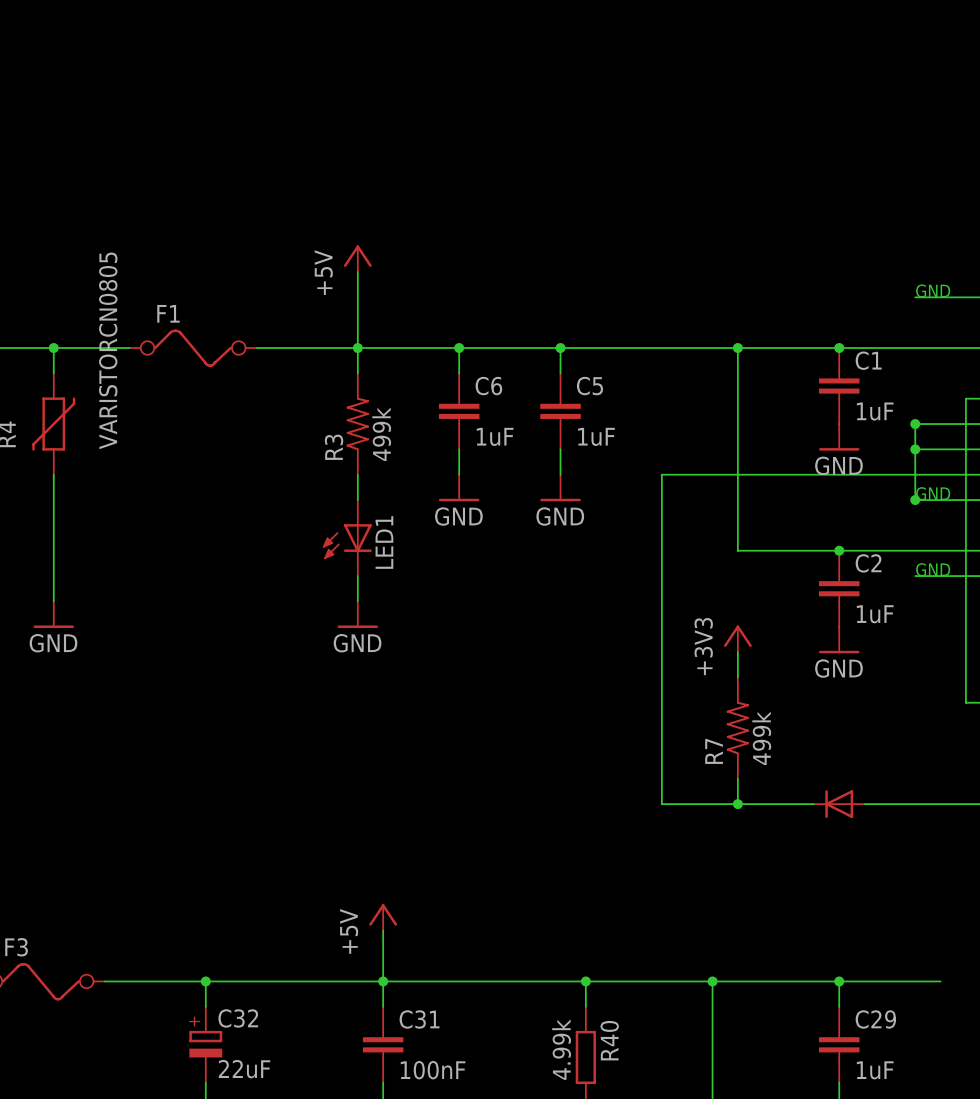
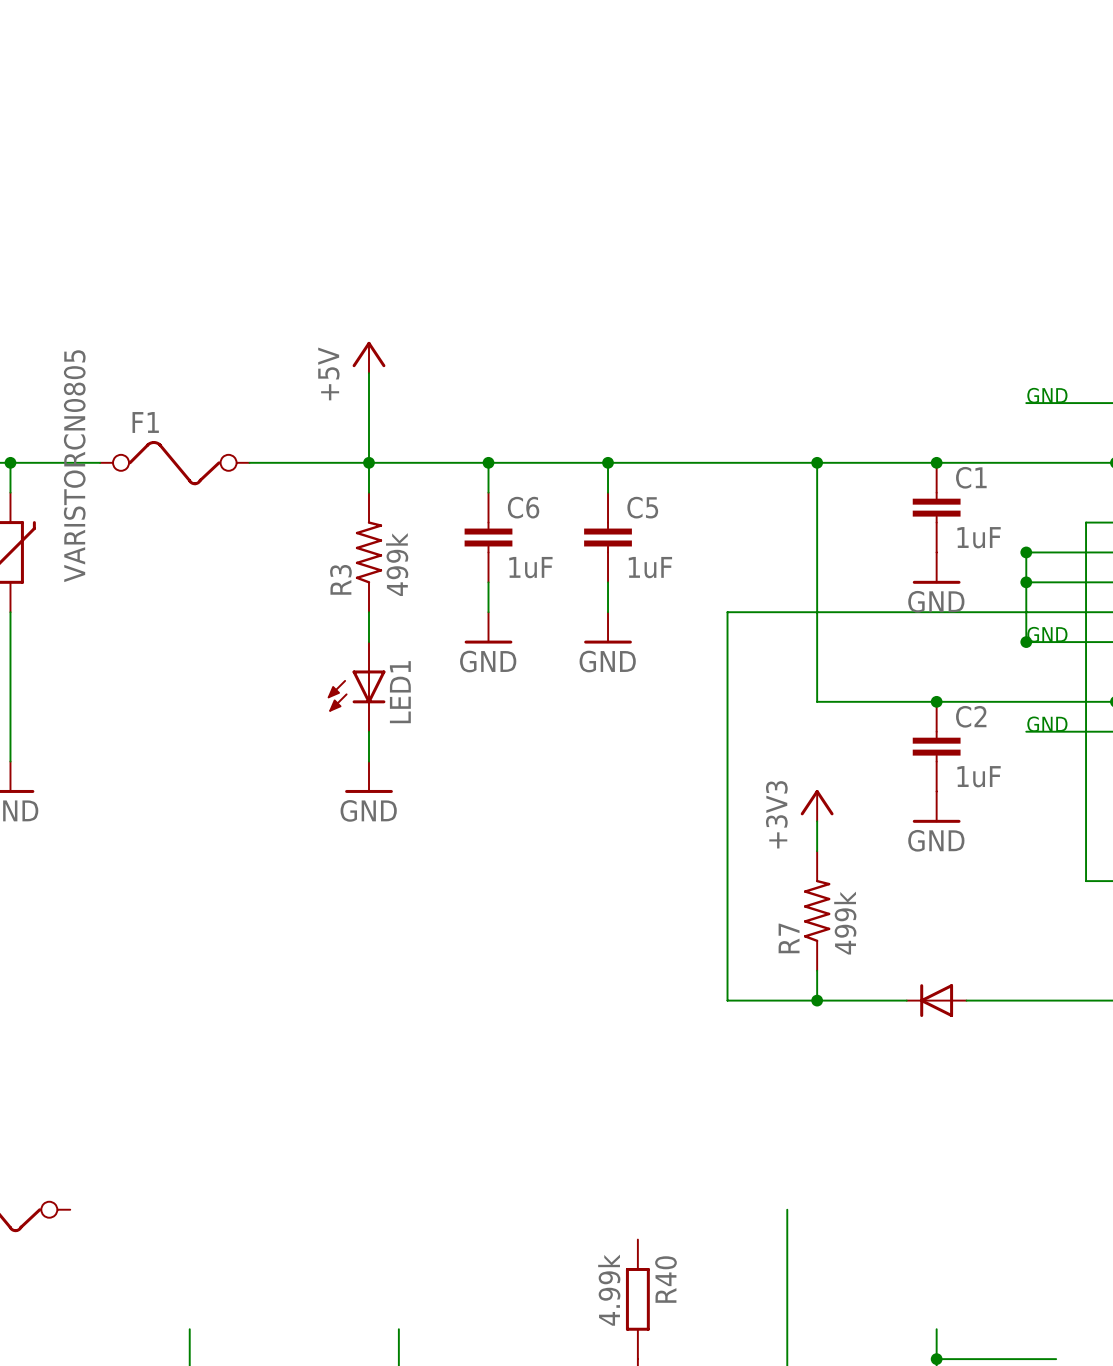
power symbol: +5V (383, 917) -> none
wire: (383, 930) (383, 1006) -> none
wire: (104, 981) (940, 981) -> none
wire: (205, 981) (205, 1006) -> none
junction: (205, 981) -> none
junction: (383, 981) -> none
wire: (585, 981) (585, 1006) -> none
junction: (585, 981) -> none
junction: (712, 981) -> none
wire: (839, 981) (839, 1006) -> none
junction: (839, 981) -> none
C32: 22uF (205, 1044) -> none
C31: 100nF (383, 1044) -> none
C29: 1uF (839, 1044) -> none

